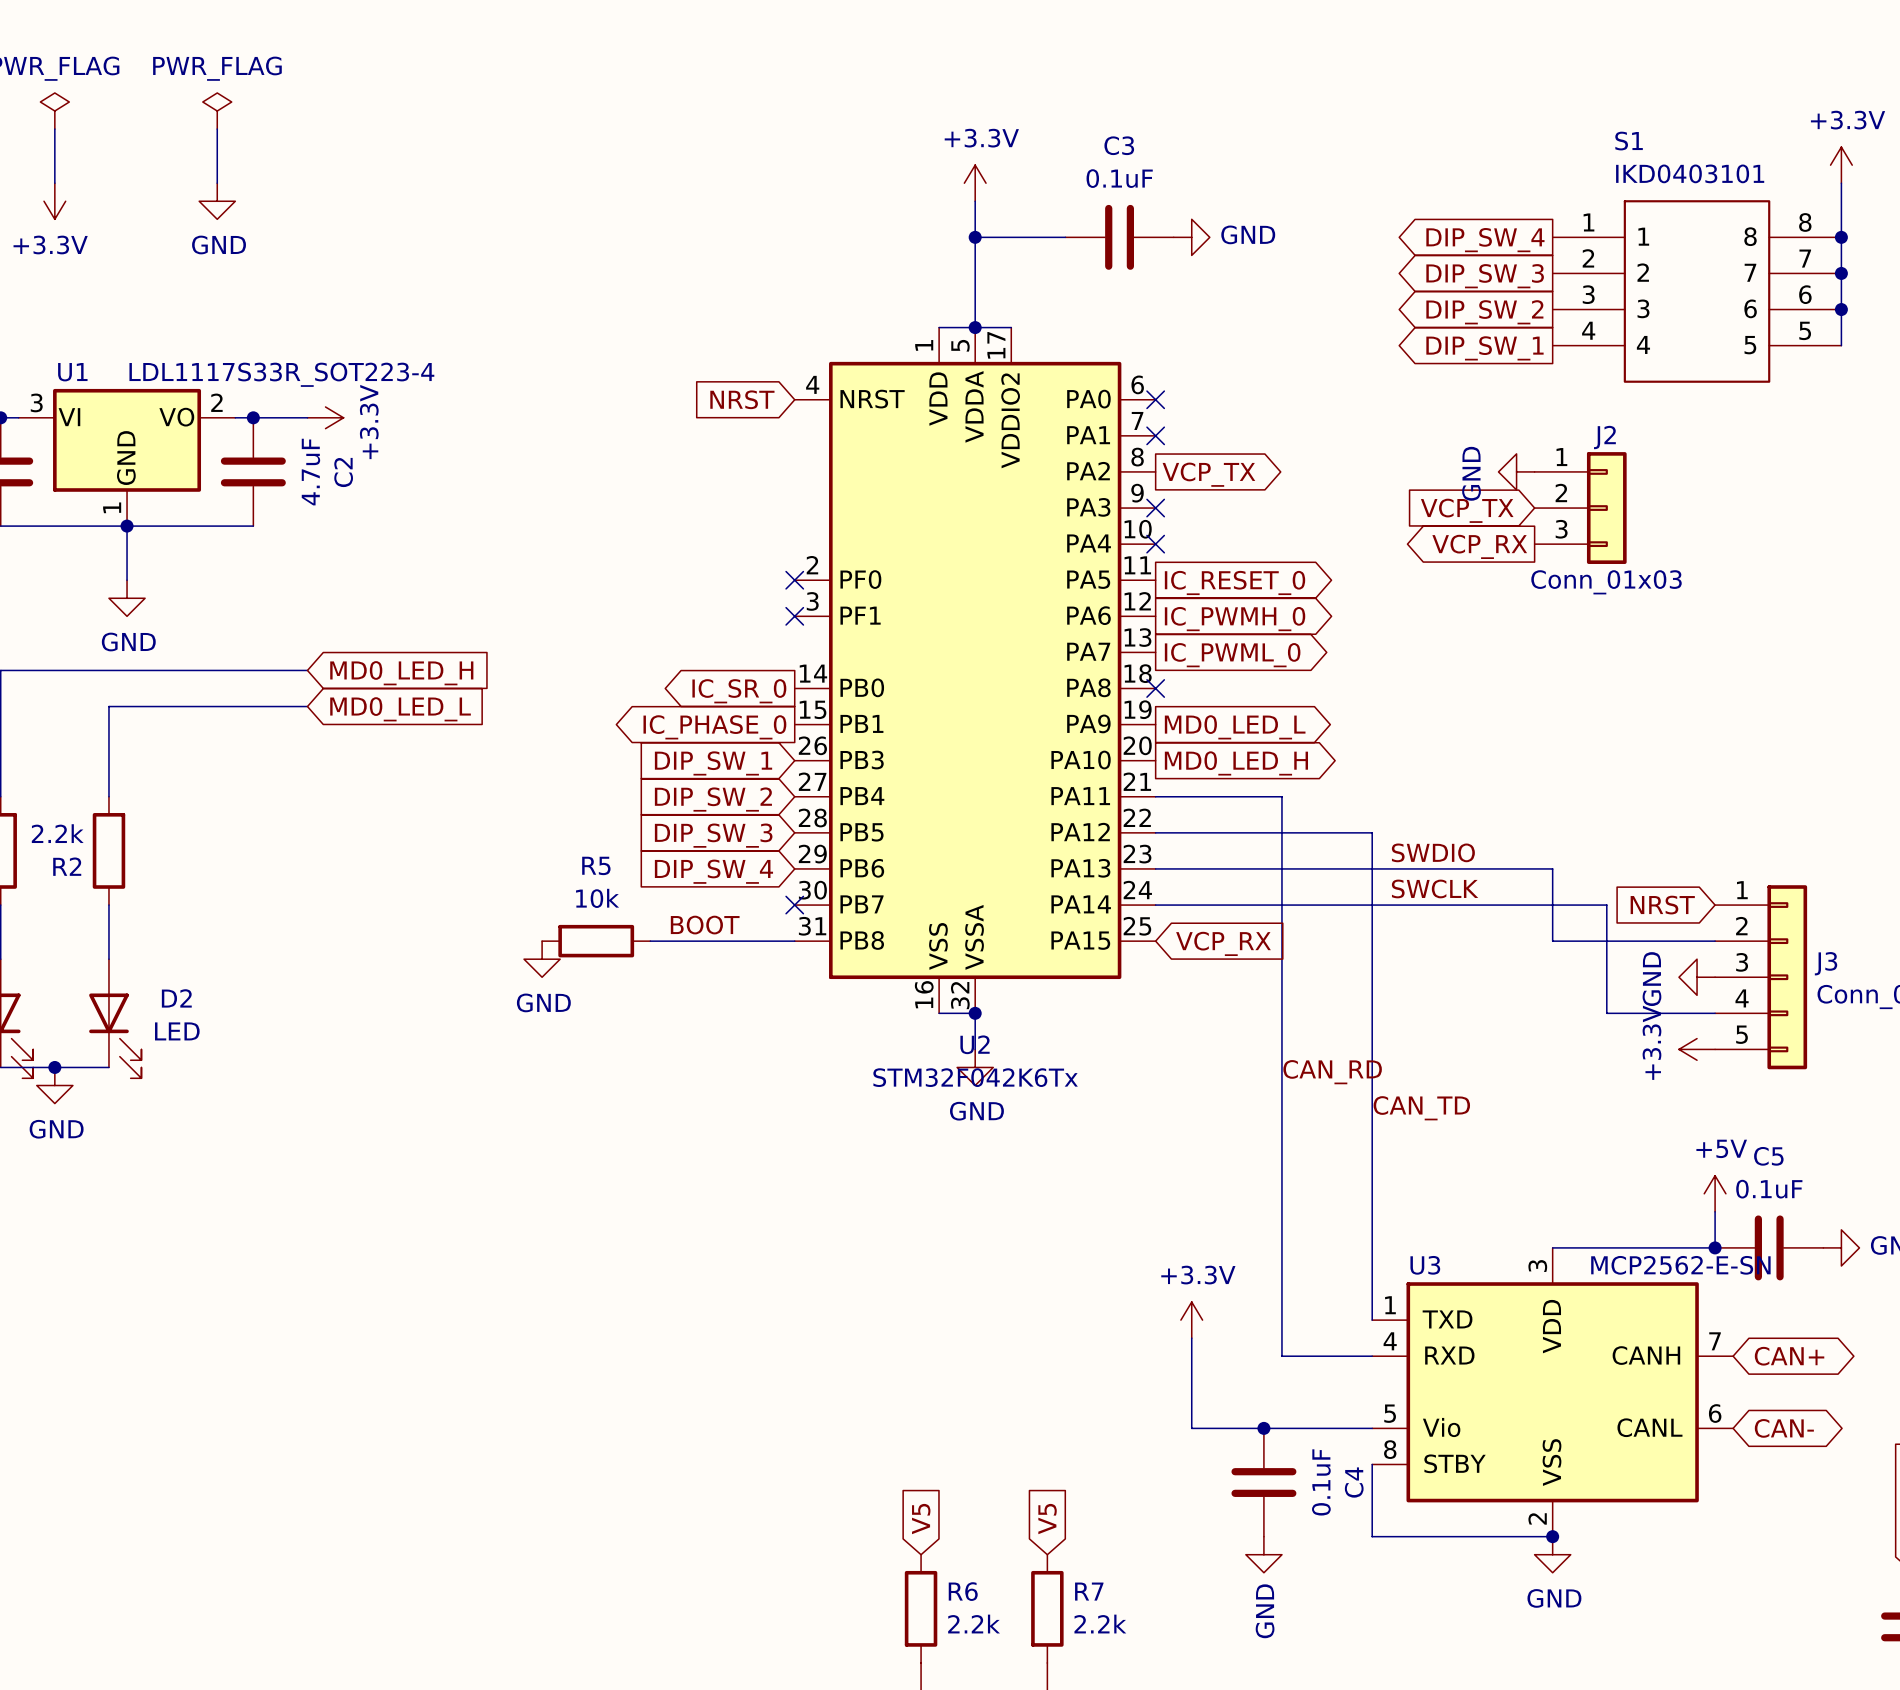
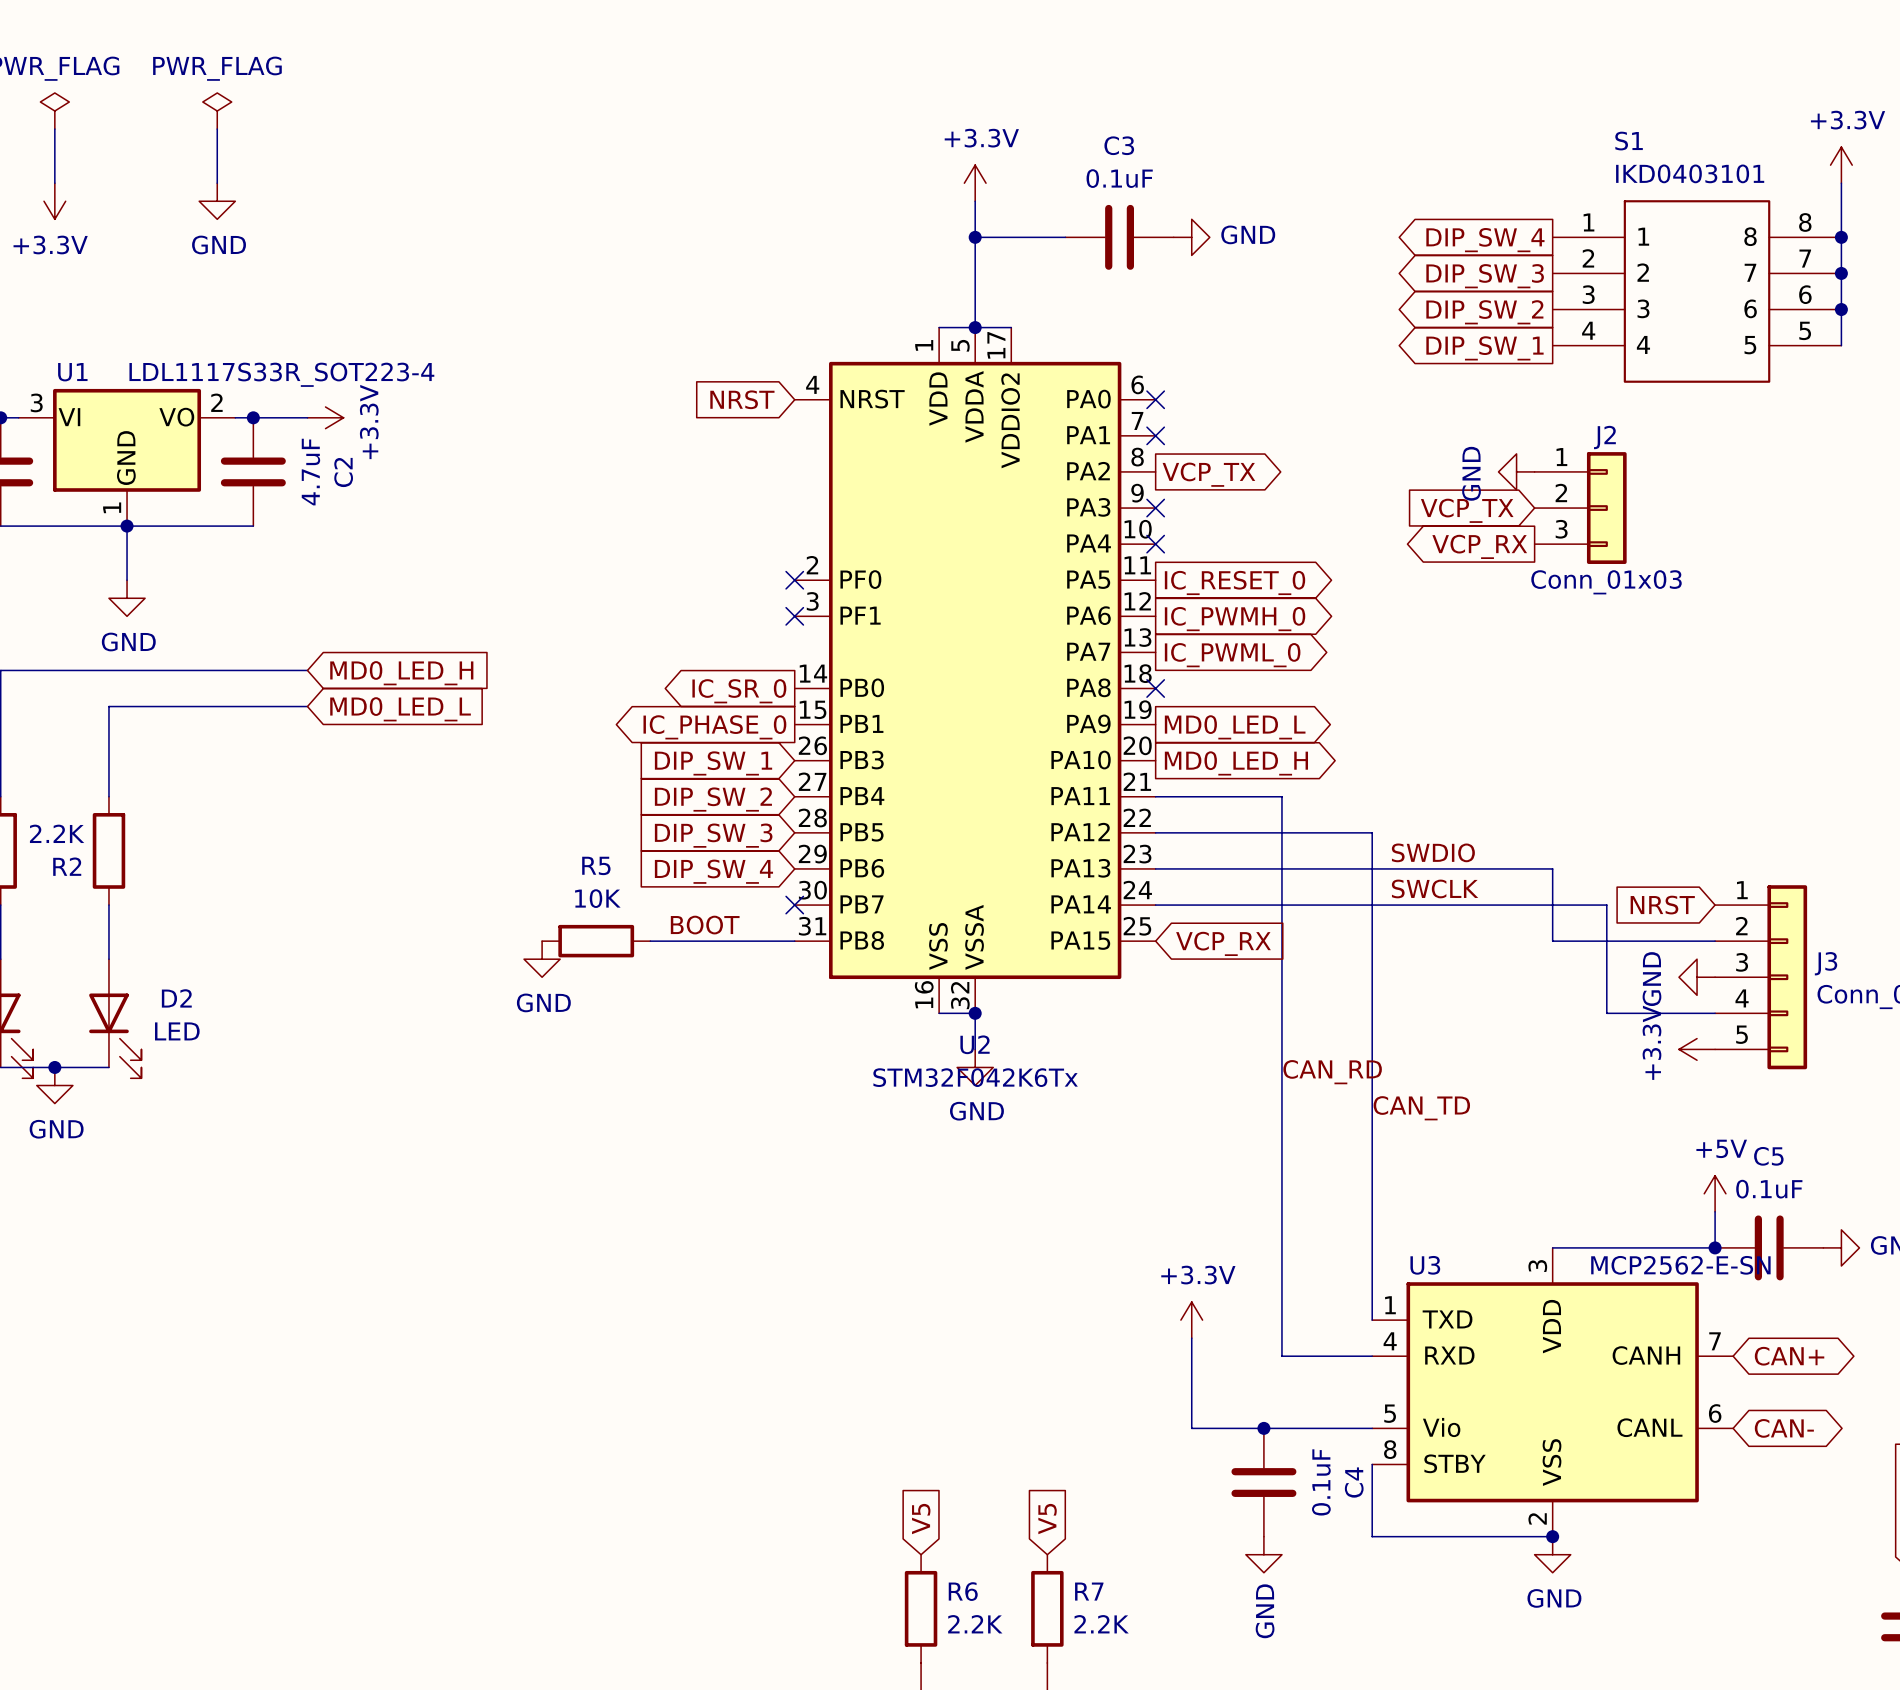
R2 value: 2.2k (57, 833) -> 2.2K (57, 833)
R5 value: 10k (597, 898) -> 10K (597, 898)
R6 value: 2.2k (974, 1624) -> 2.2K (975, 1624)
R7 value: 2.2k (1100, 1624) -> 2.2K (1101, 1624)

